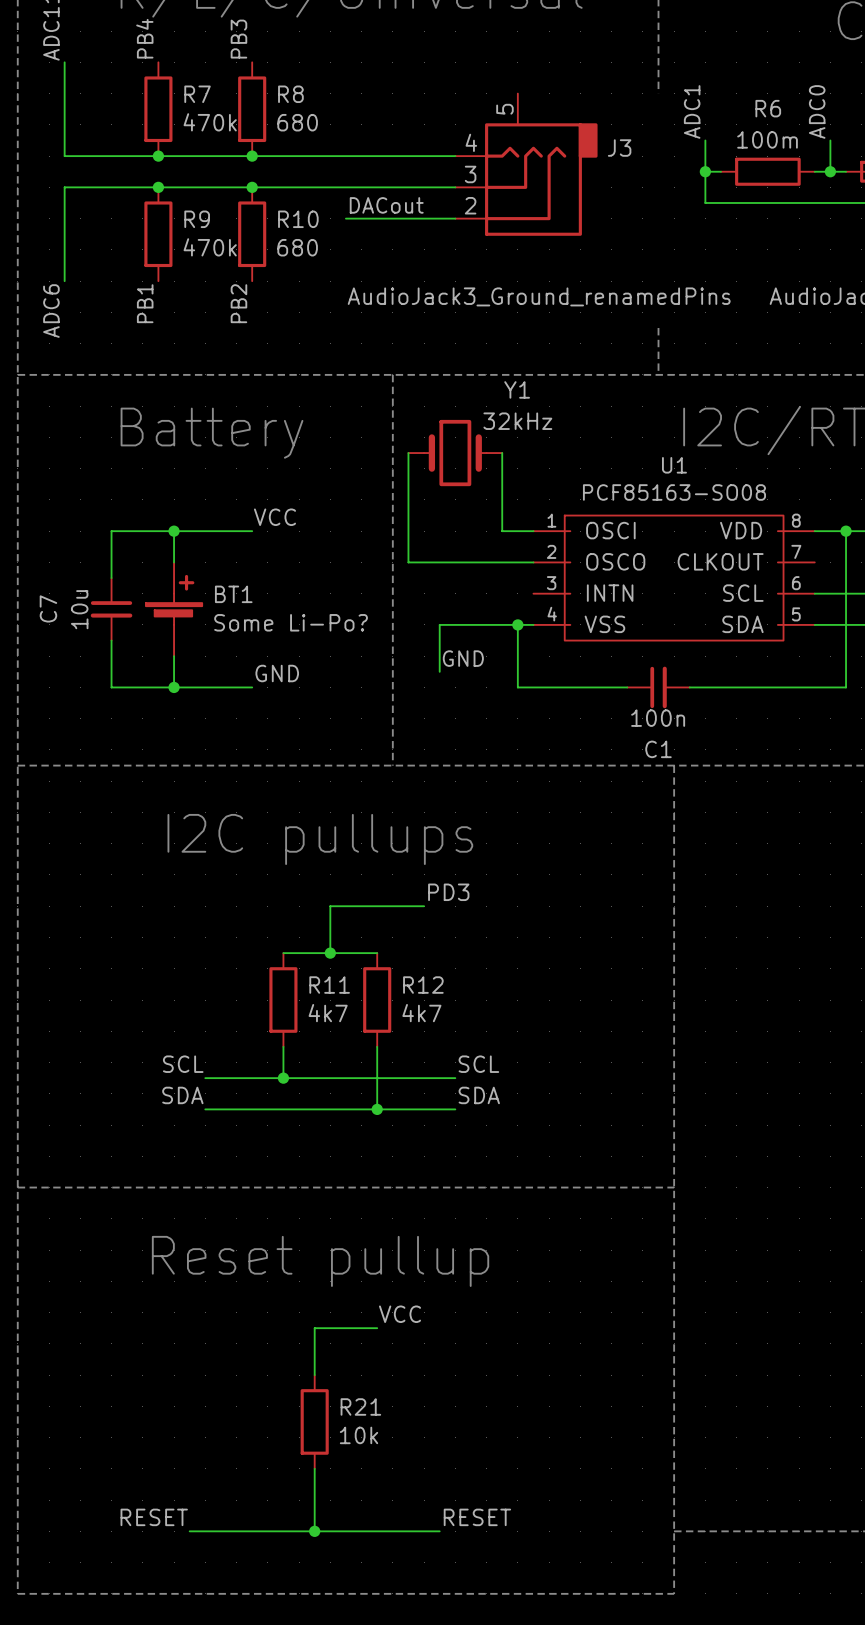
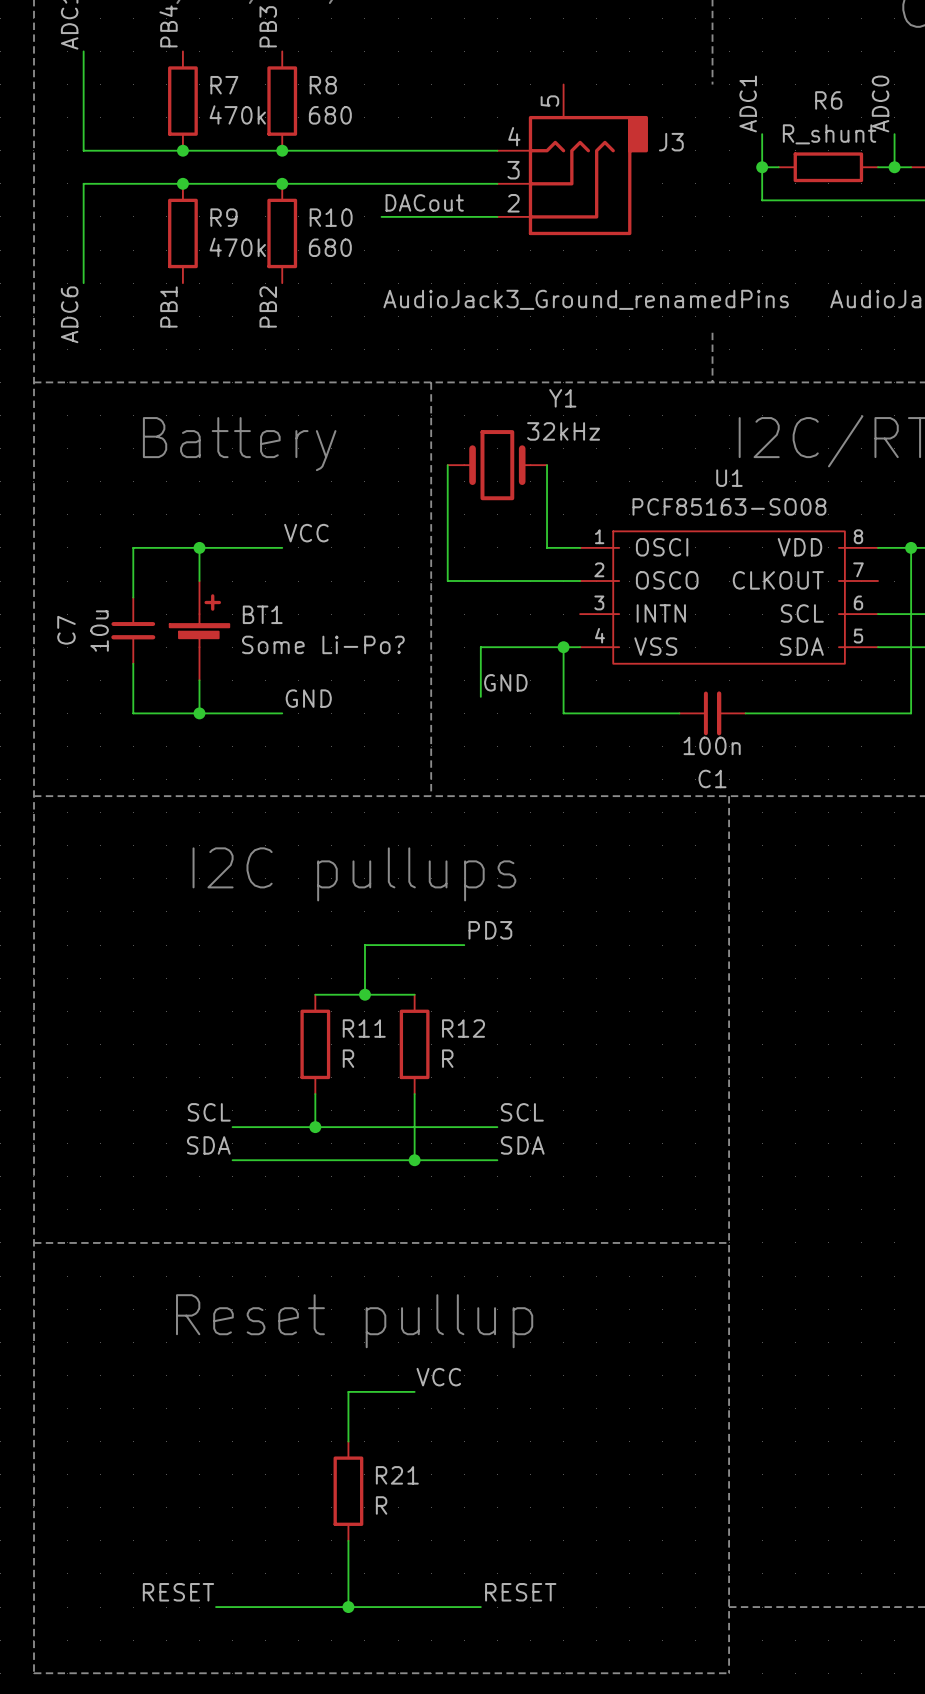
R6 value: 100m (767, 139) -> R_shunt (829, 134)
R11 value: 4k7 (328, 1013) -> R (348, 1058)
R12 value: 4k7 (421, 1013) -> R (447, 1058)
R21 value: 10k (359, 1435) -> R (381, 1505)

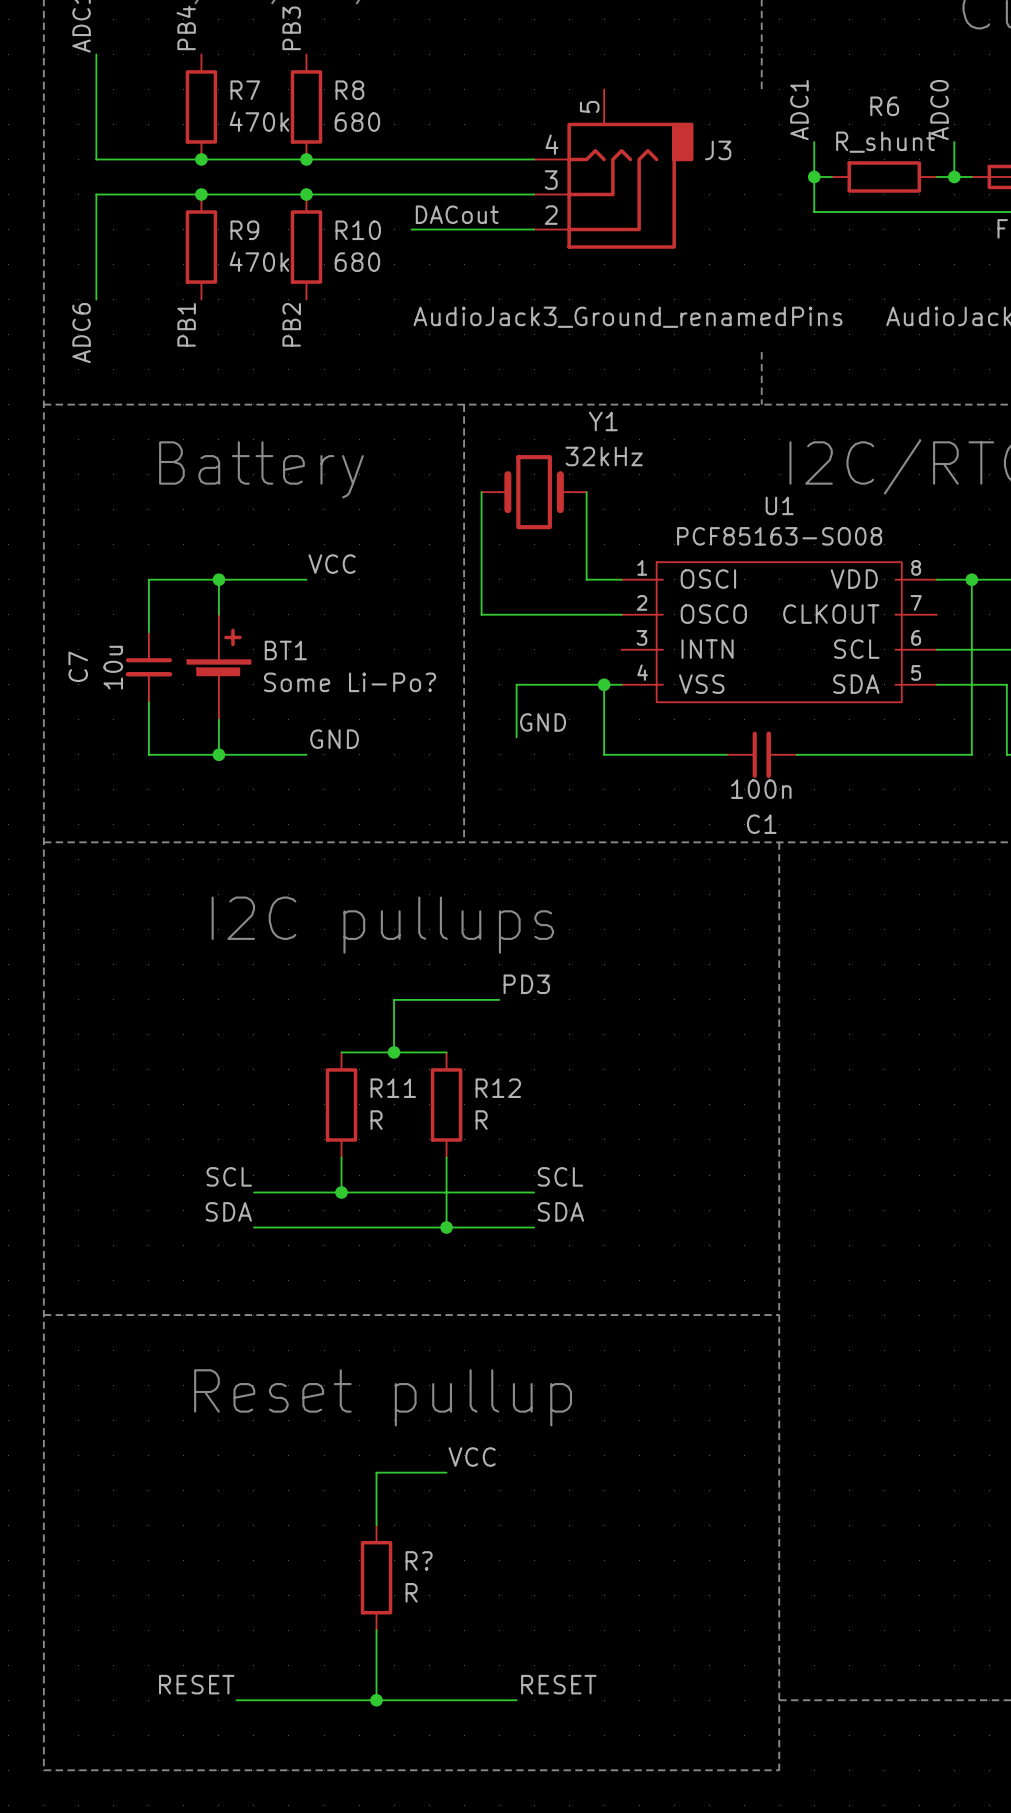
R21 name: R21 (397, 1475) -> R? (419, 1560)

